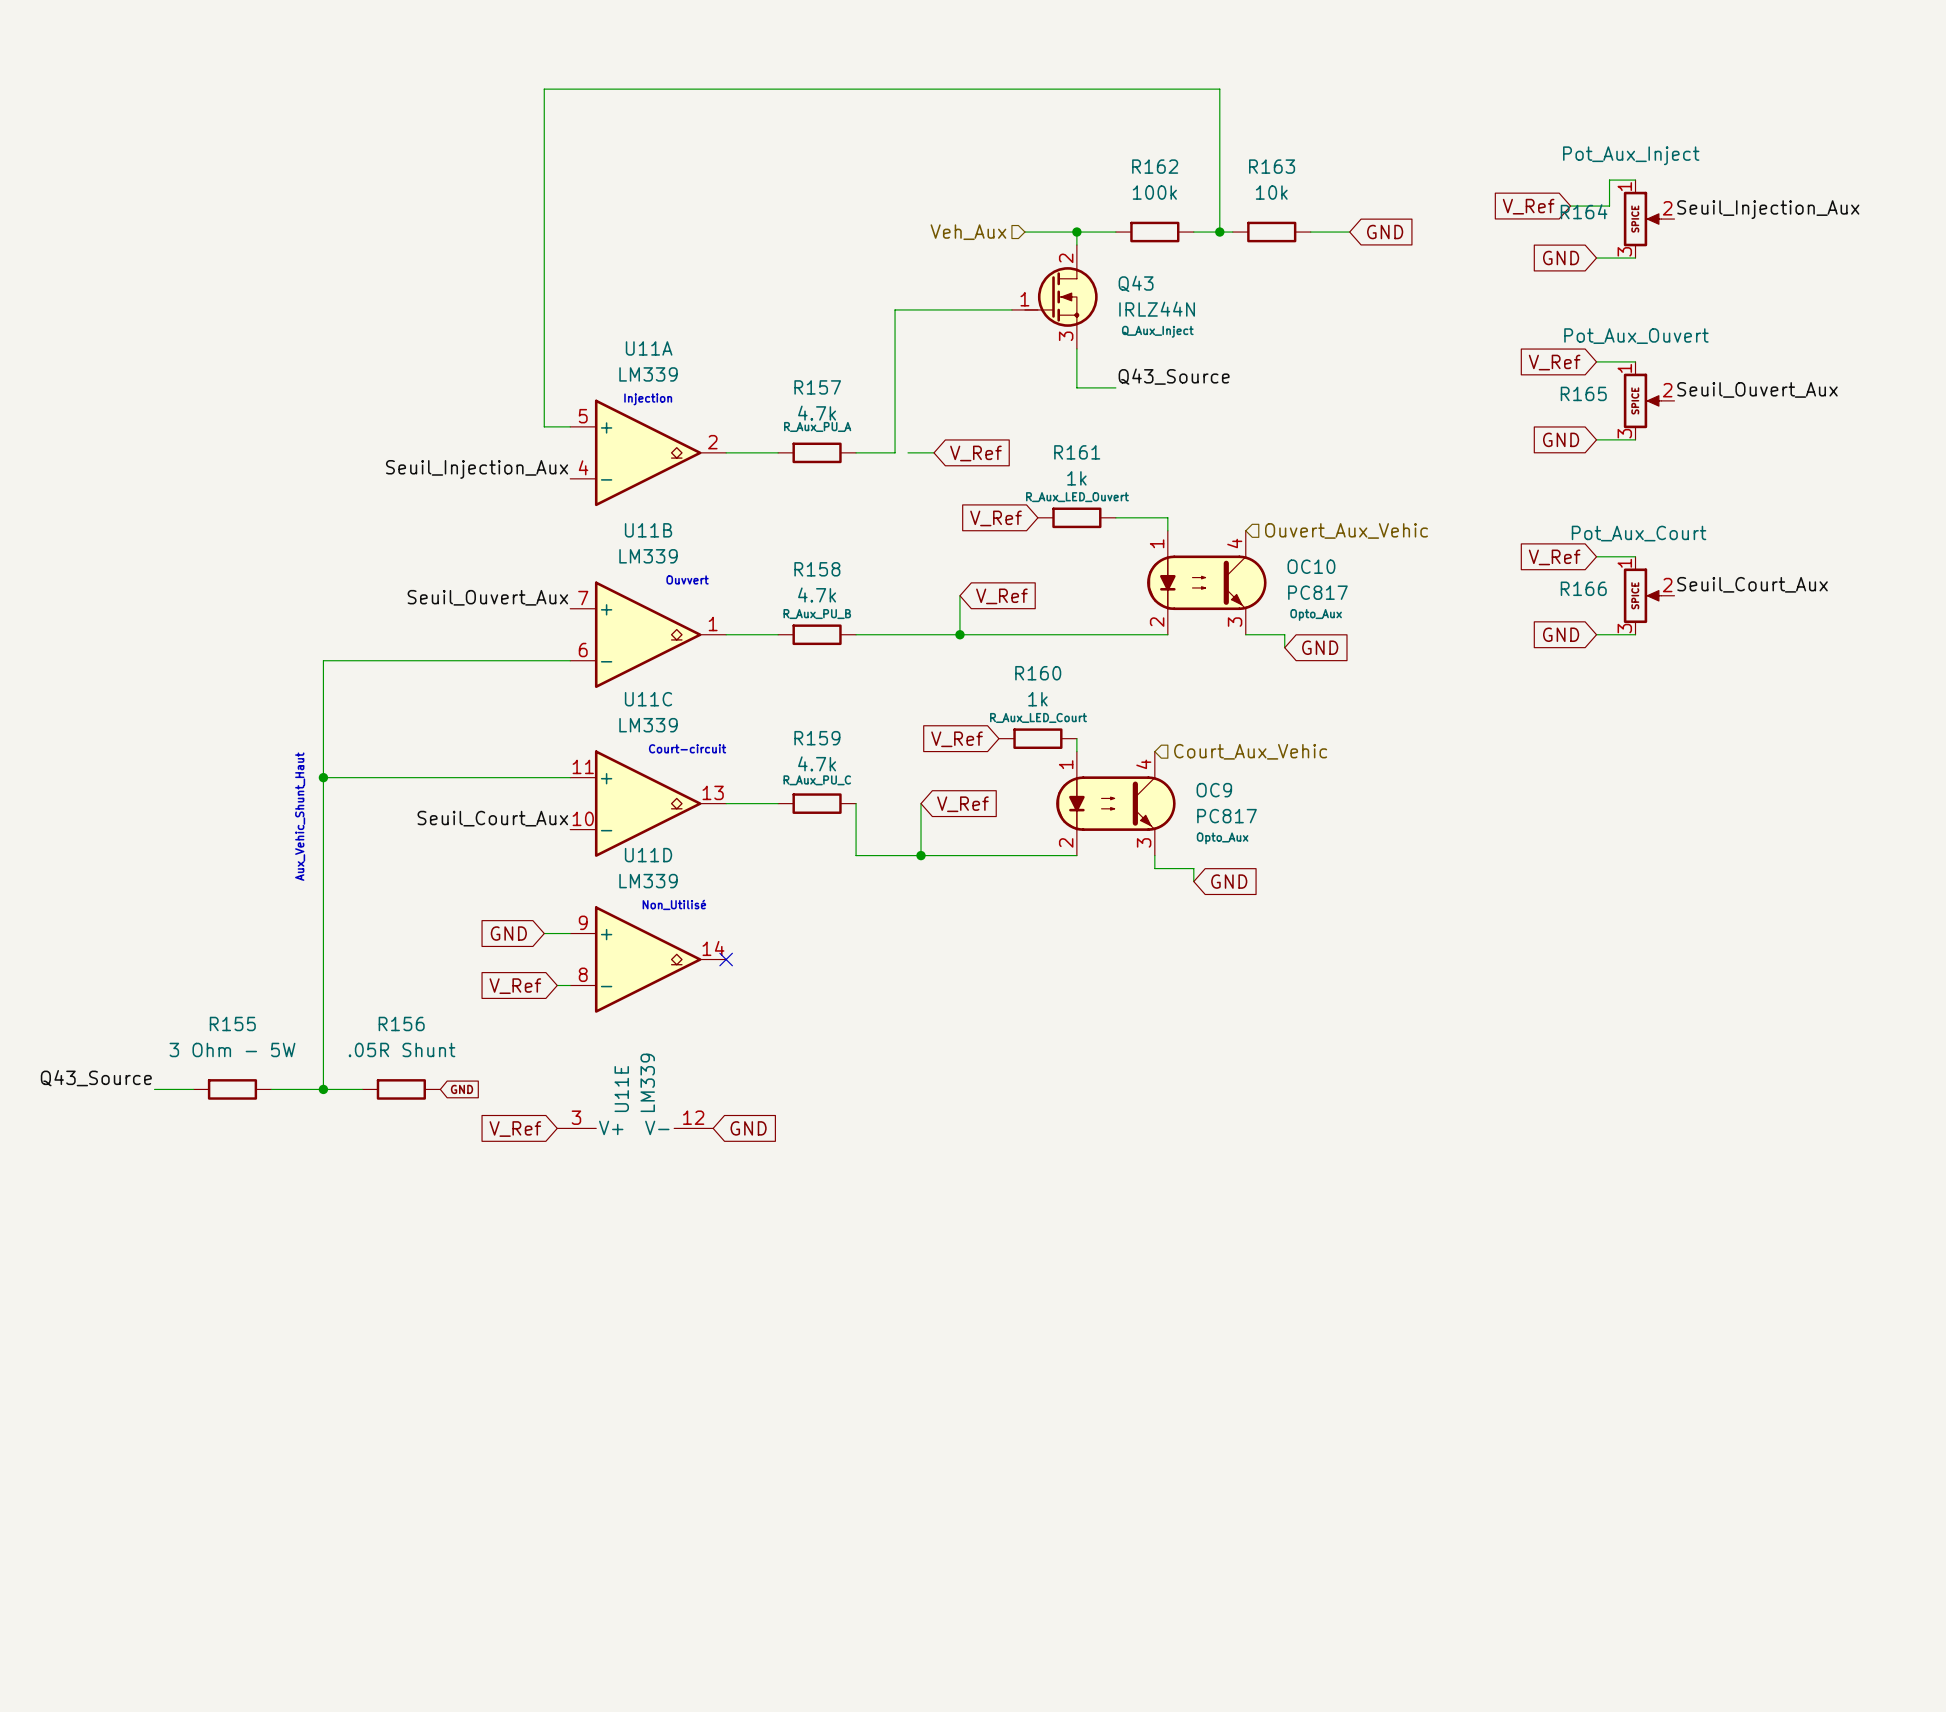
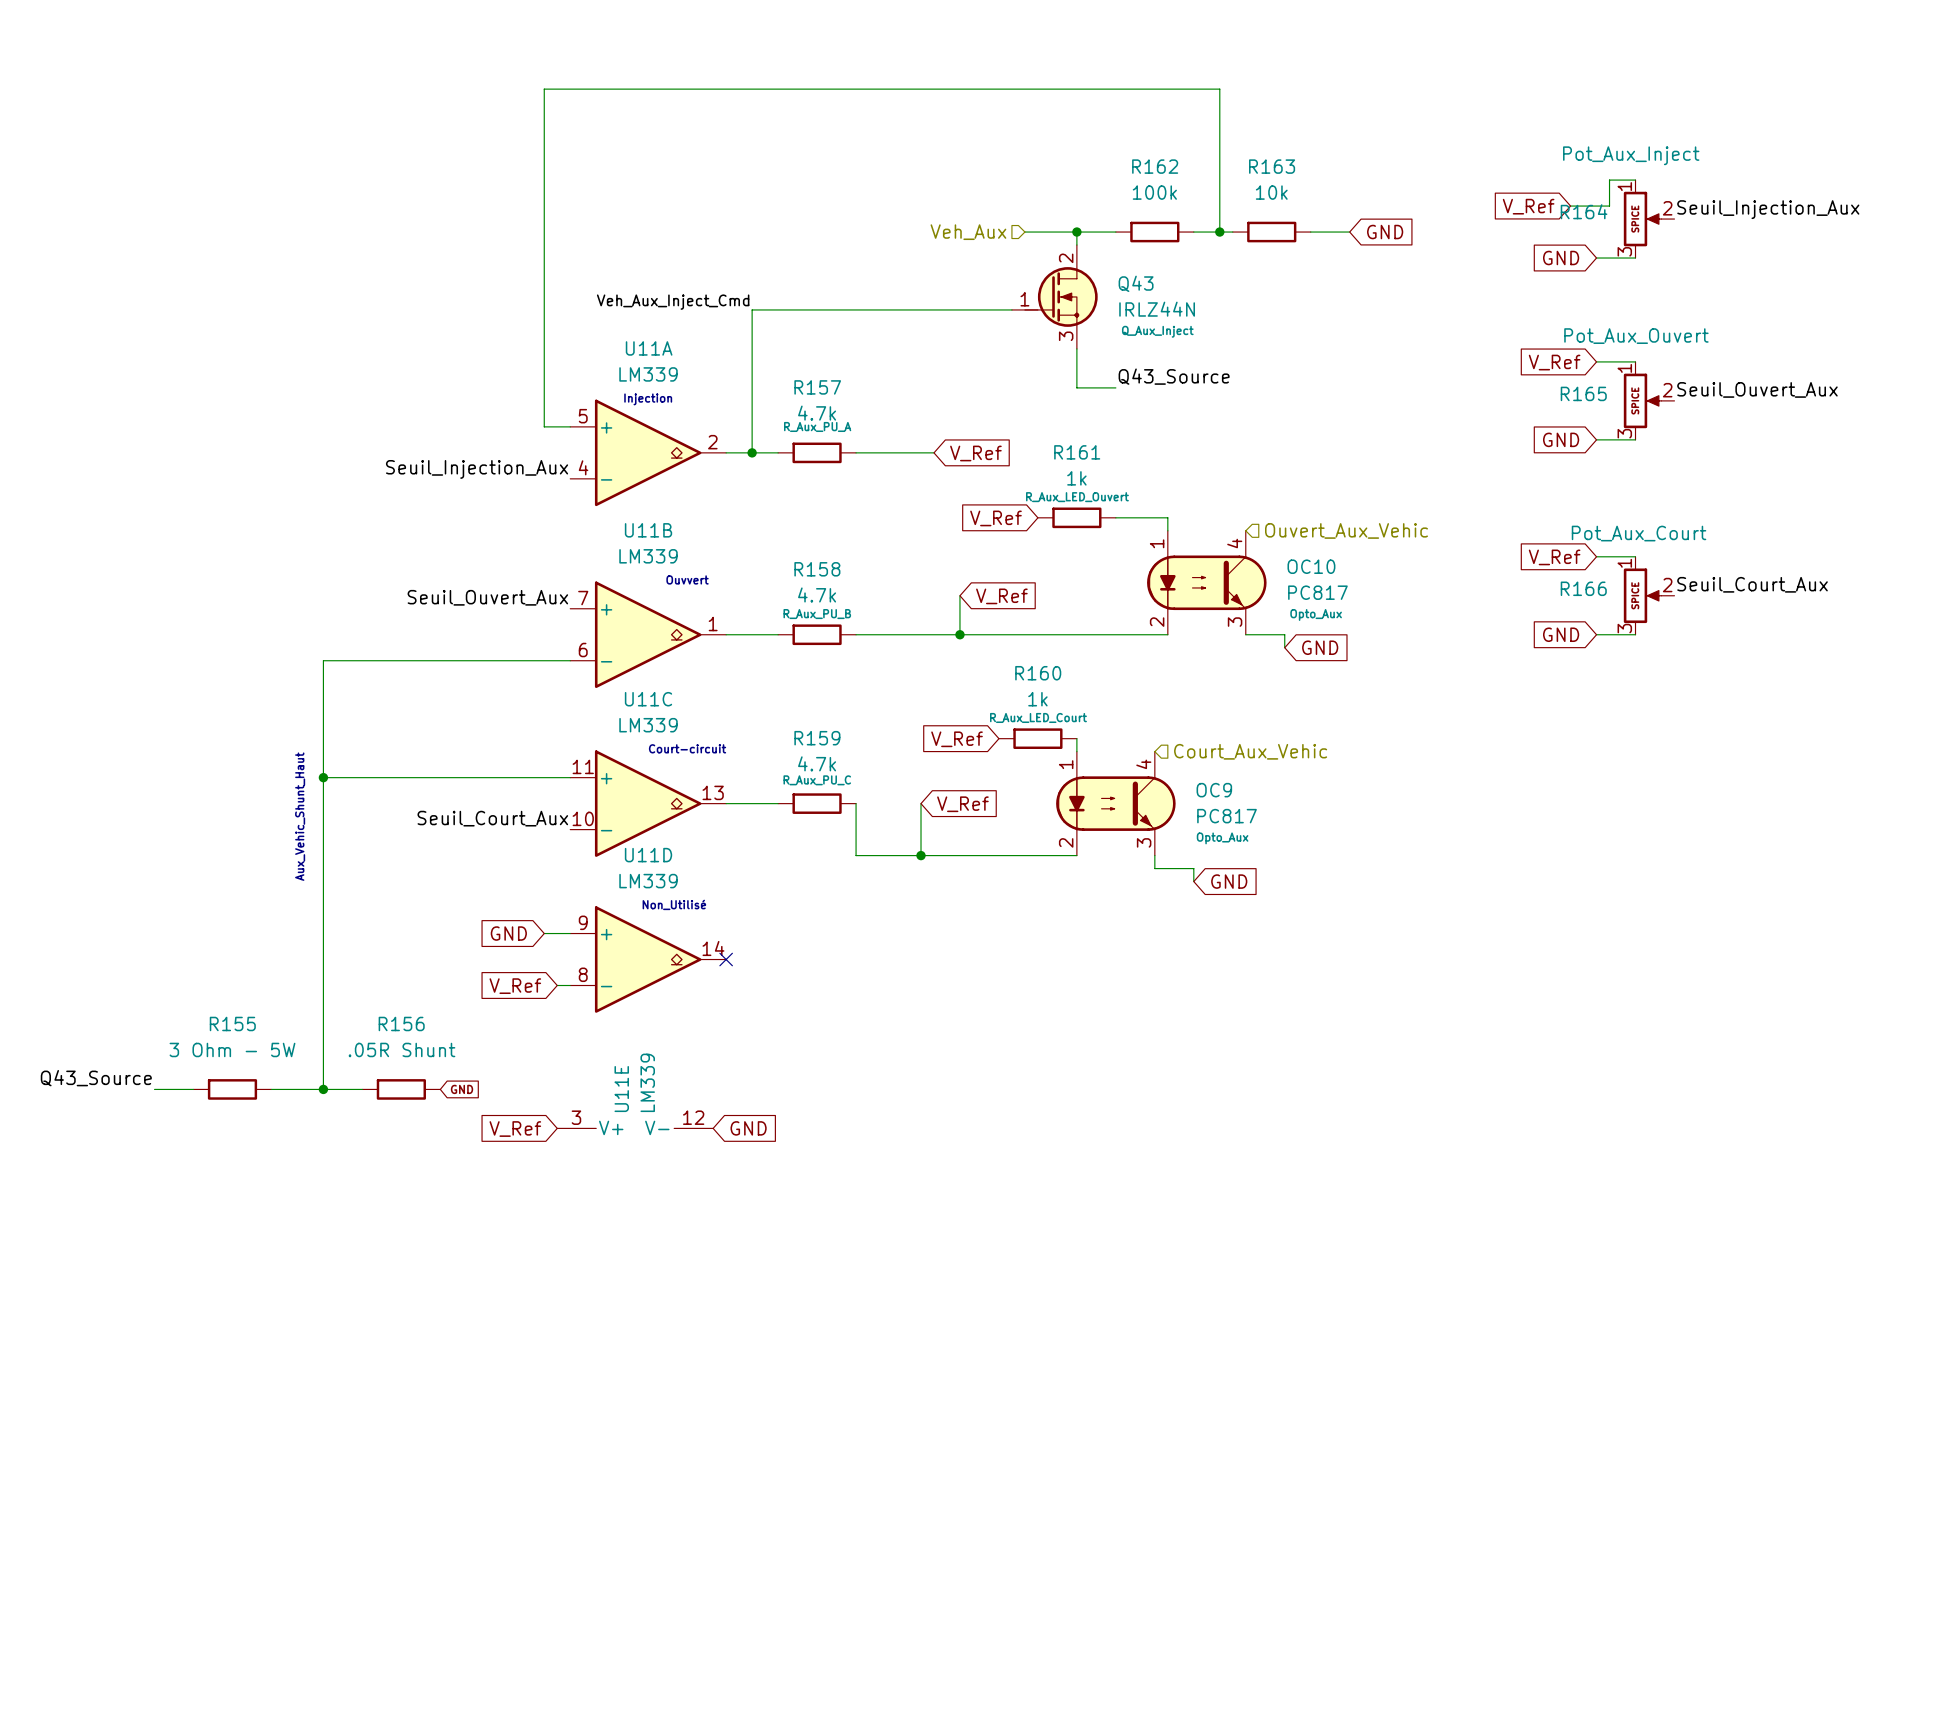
label: none -> Veh_Aux_Inject_Cmd (673, 302)
wire: (895, 309) (895, 452) -> (895, 309) (752, 309) (752, 452)
junction: none -> (752, 452)
wire: none -> (895, 452) (908, 452)

